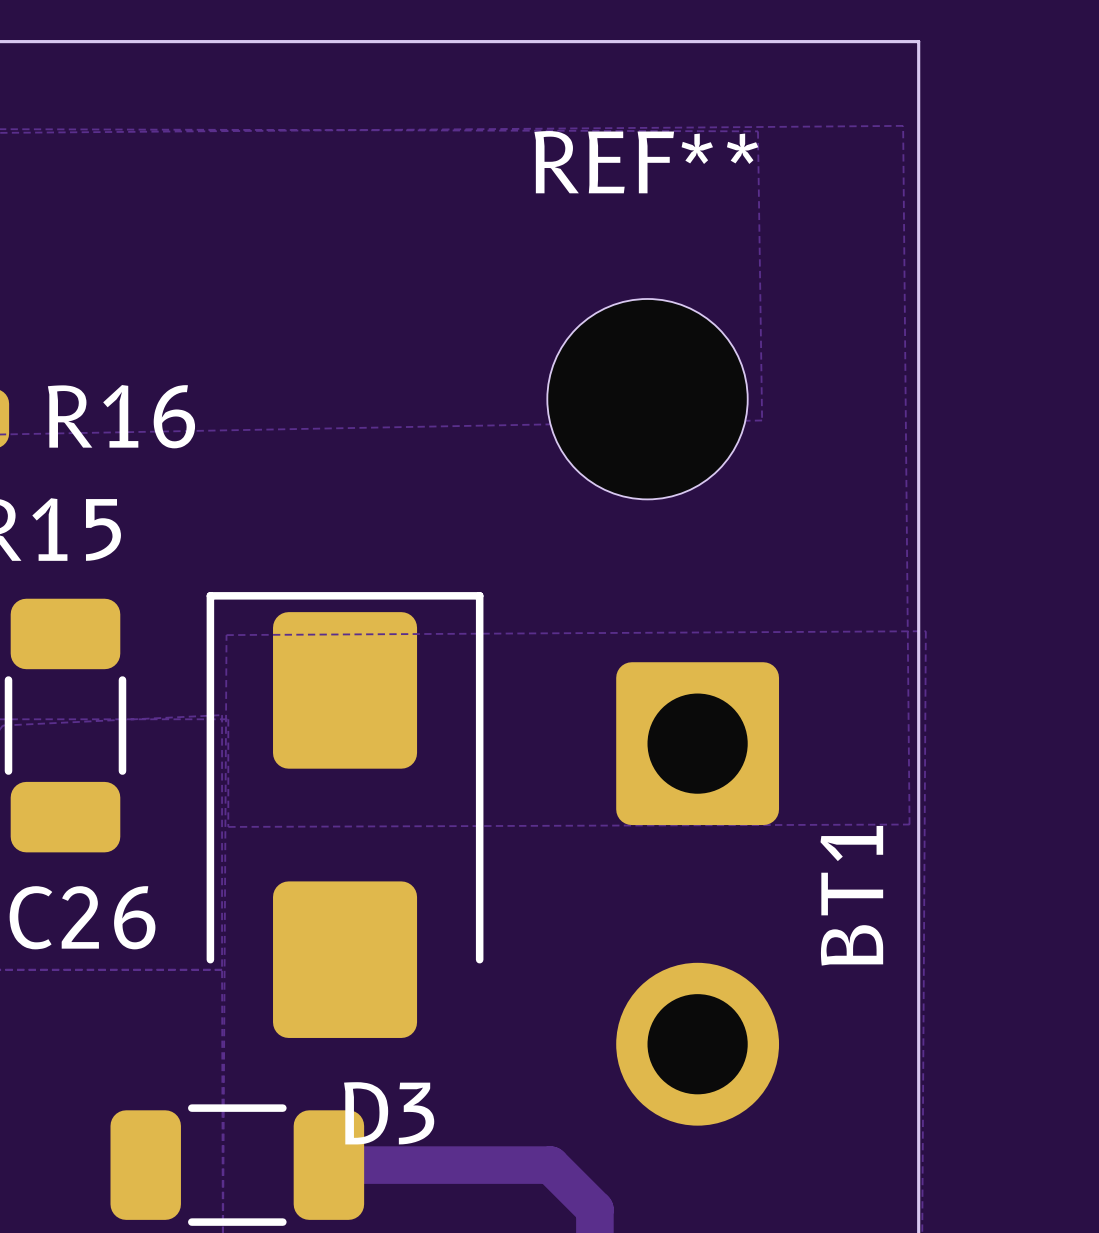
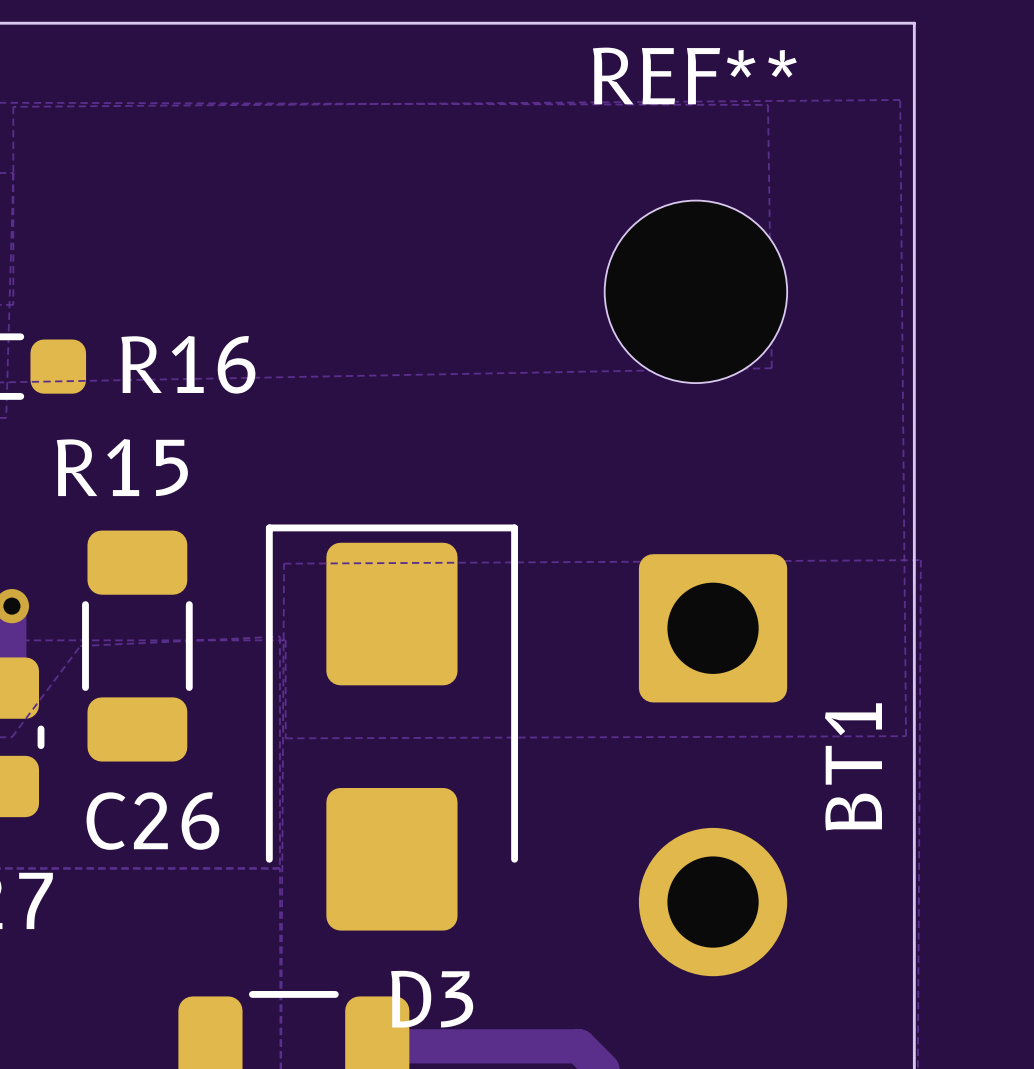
REF** position: (647, 399) -> (695, 291)
BT1 position: (697, 893) -> (713, 765)

